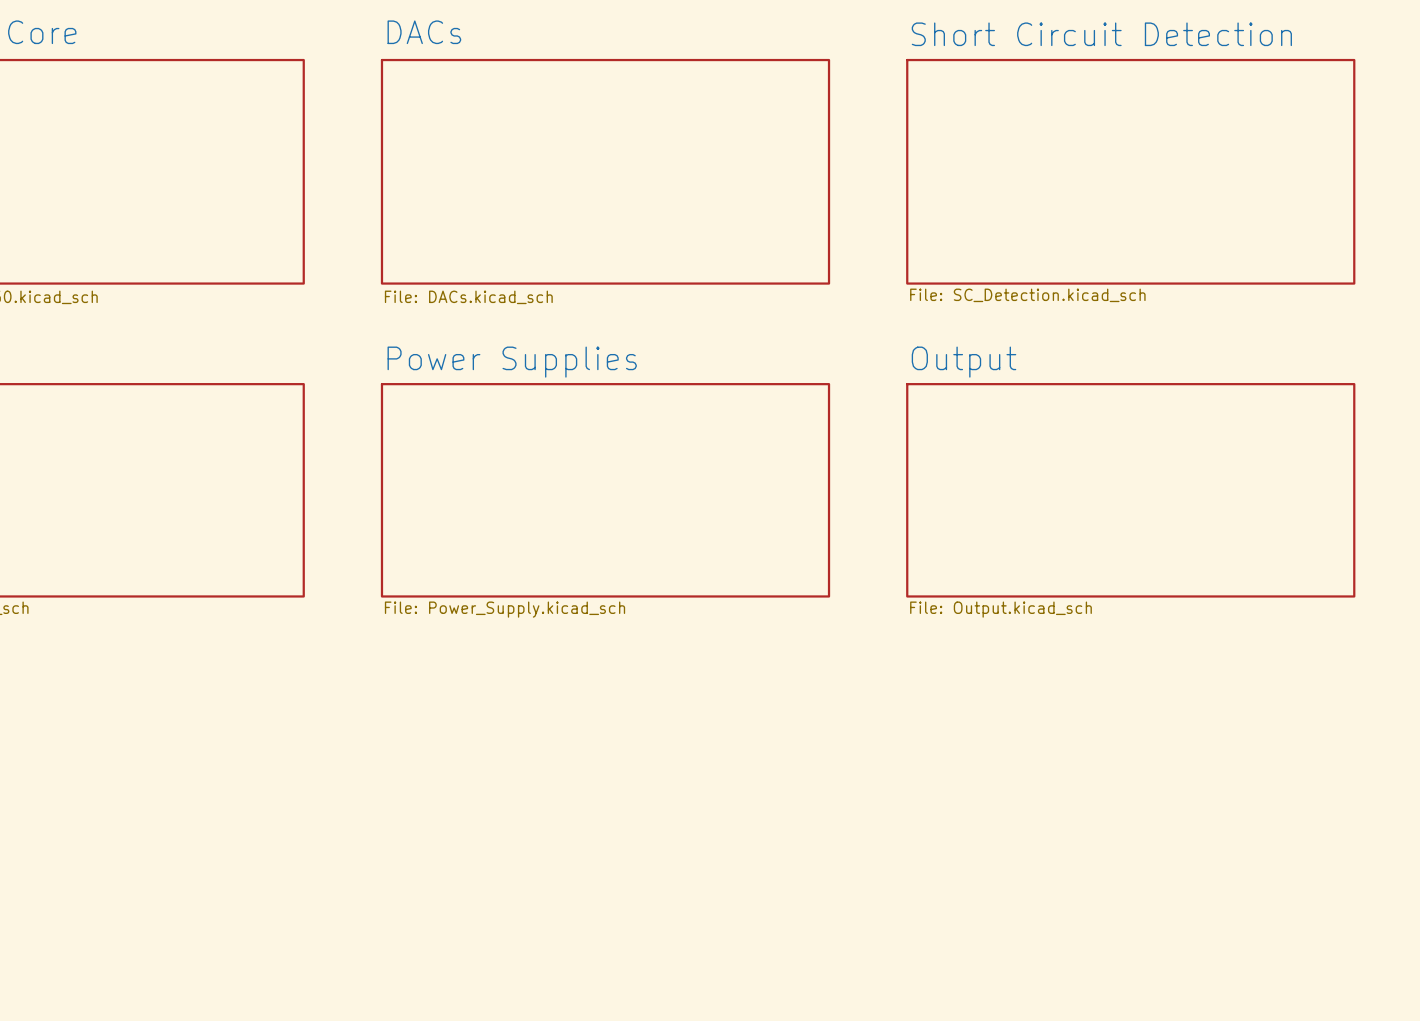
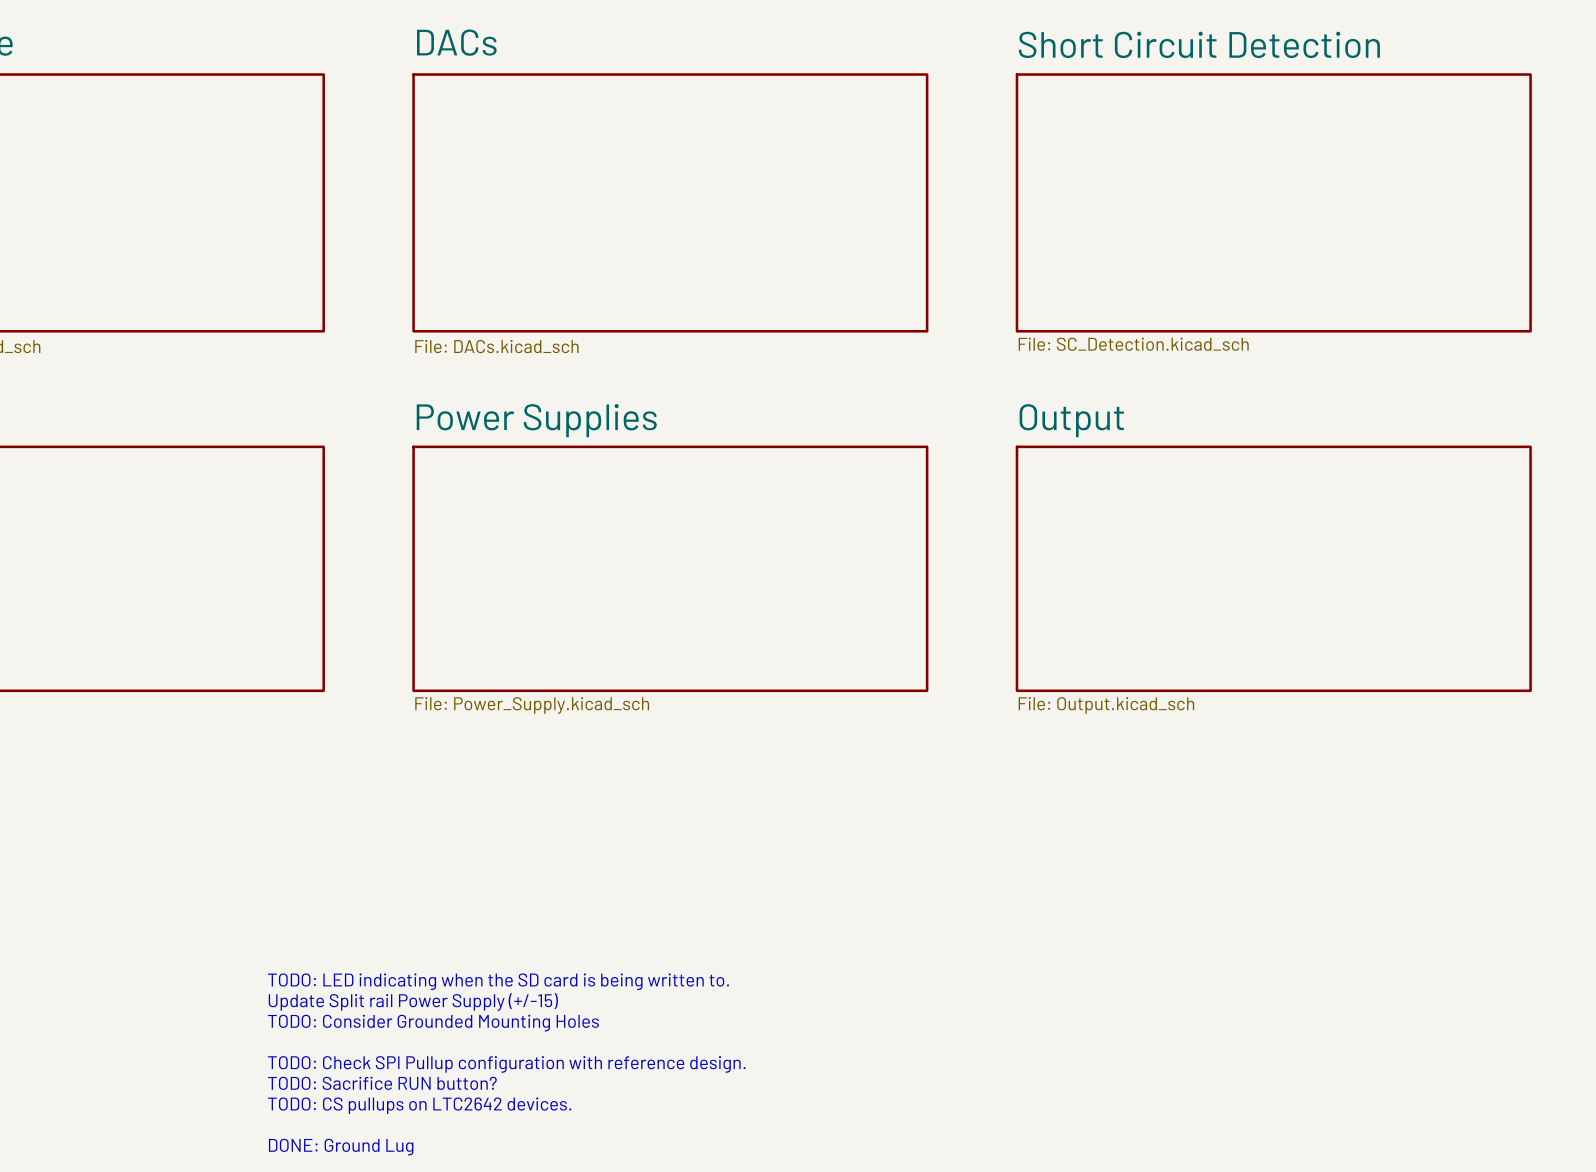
text: none -> TODO: LED indicating when the SD card is being written to. (498, 981)
text: none -> Update Split rail Power Supply (+/-15) (413, 1001)
text: none -> TODO: Consider Grounded Mounting Holes (433, 1023)
text: none -> TODO: Check SPI Pullup configuration with reference design. (506, 1064)
text: none -> TODO: Sacrifice RUN button? (382, 1083)
text: none -> TODO: CS pullups on LTC2642 devices. (419, 1105)
text: none -> DONE: Ground Lug (341, 1147)

